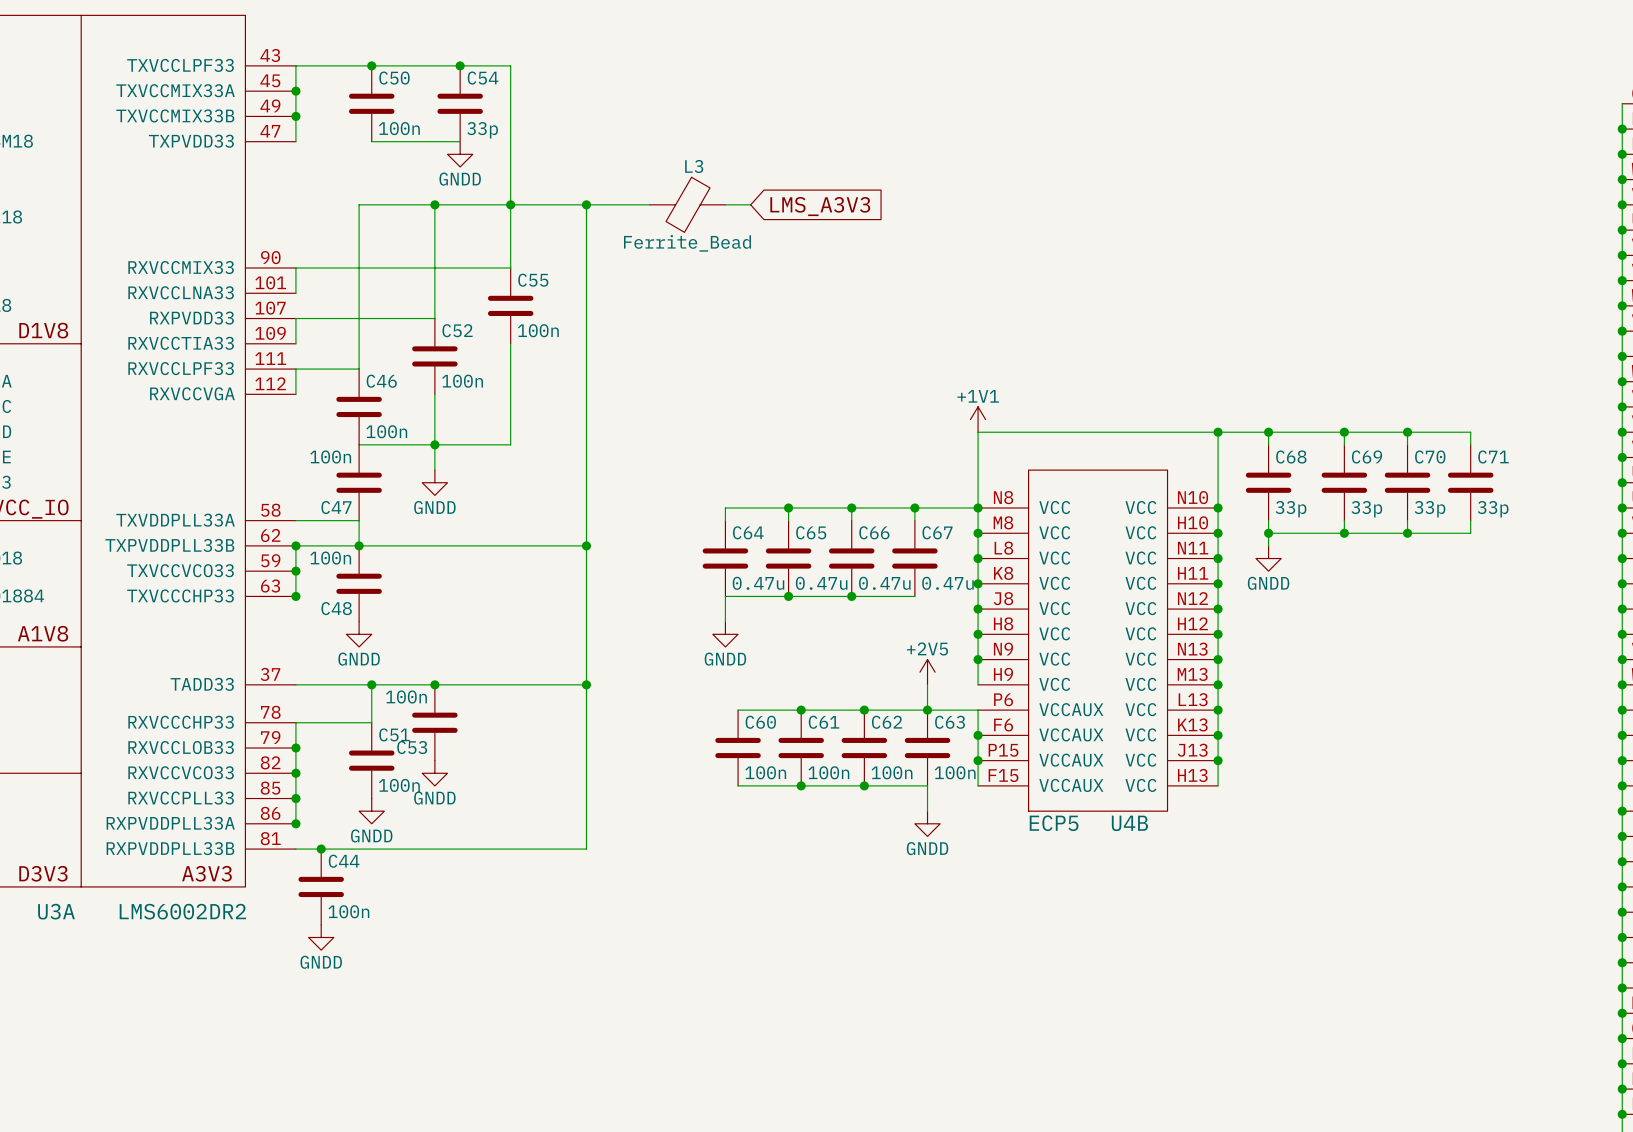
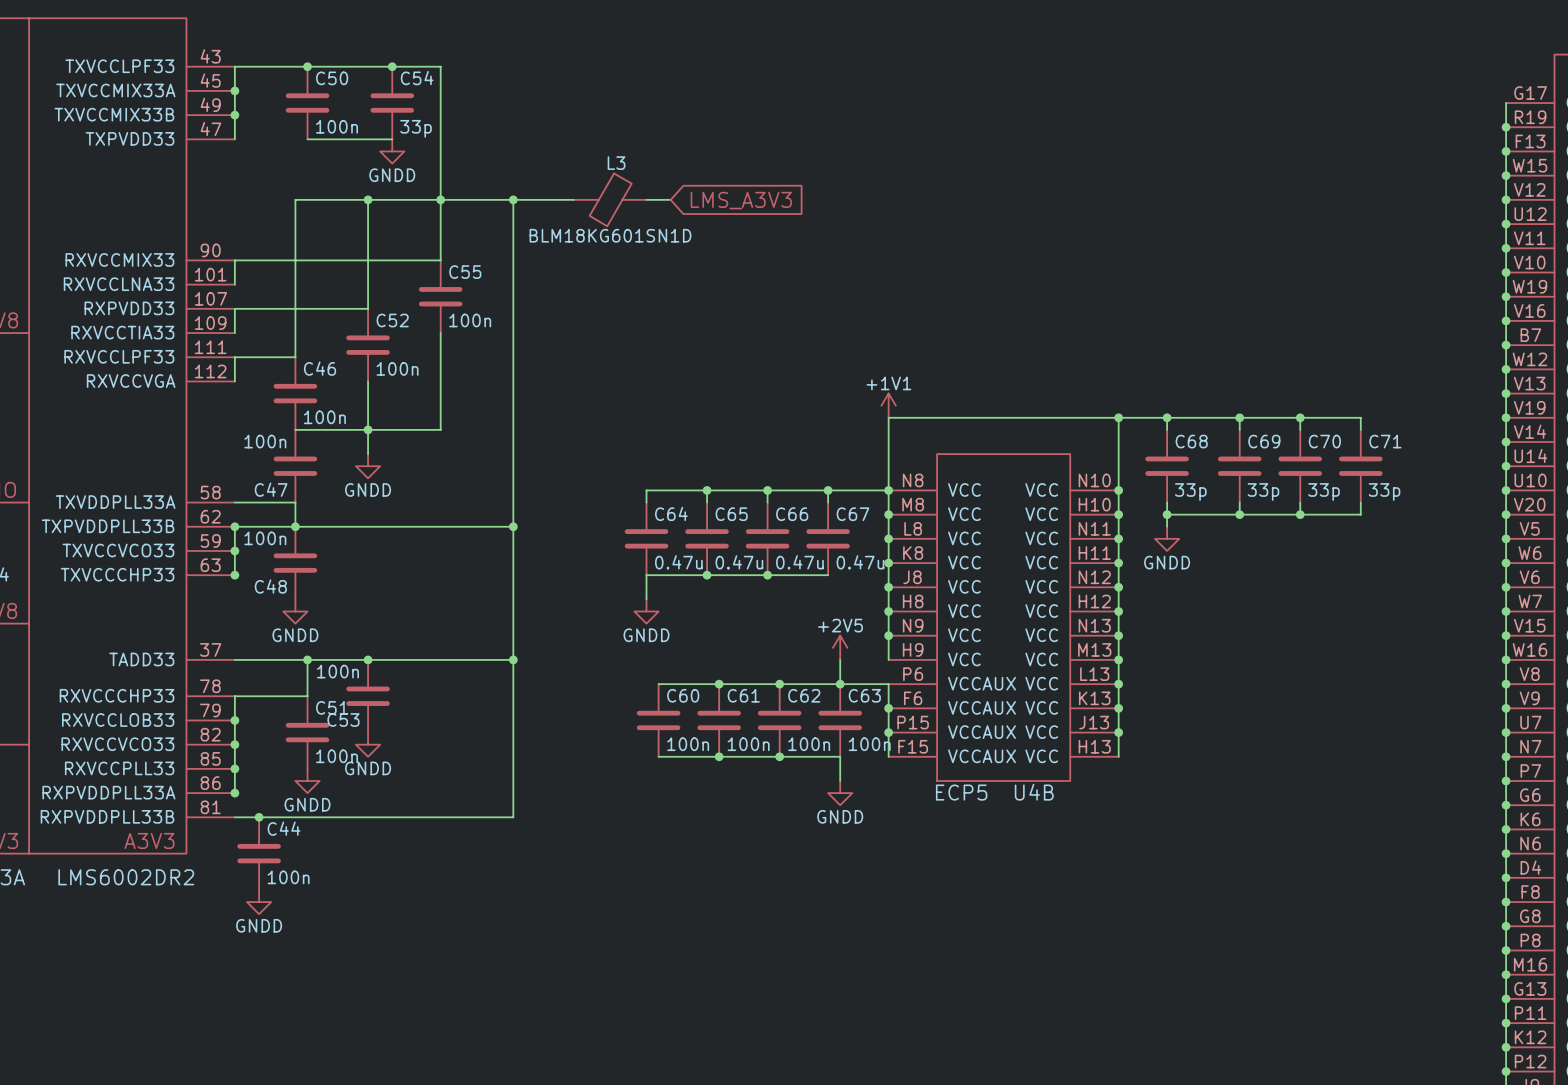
L3 value: Ferrite_Bead (687, 243) -> BLM18KG601SN1D (610, 235)

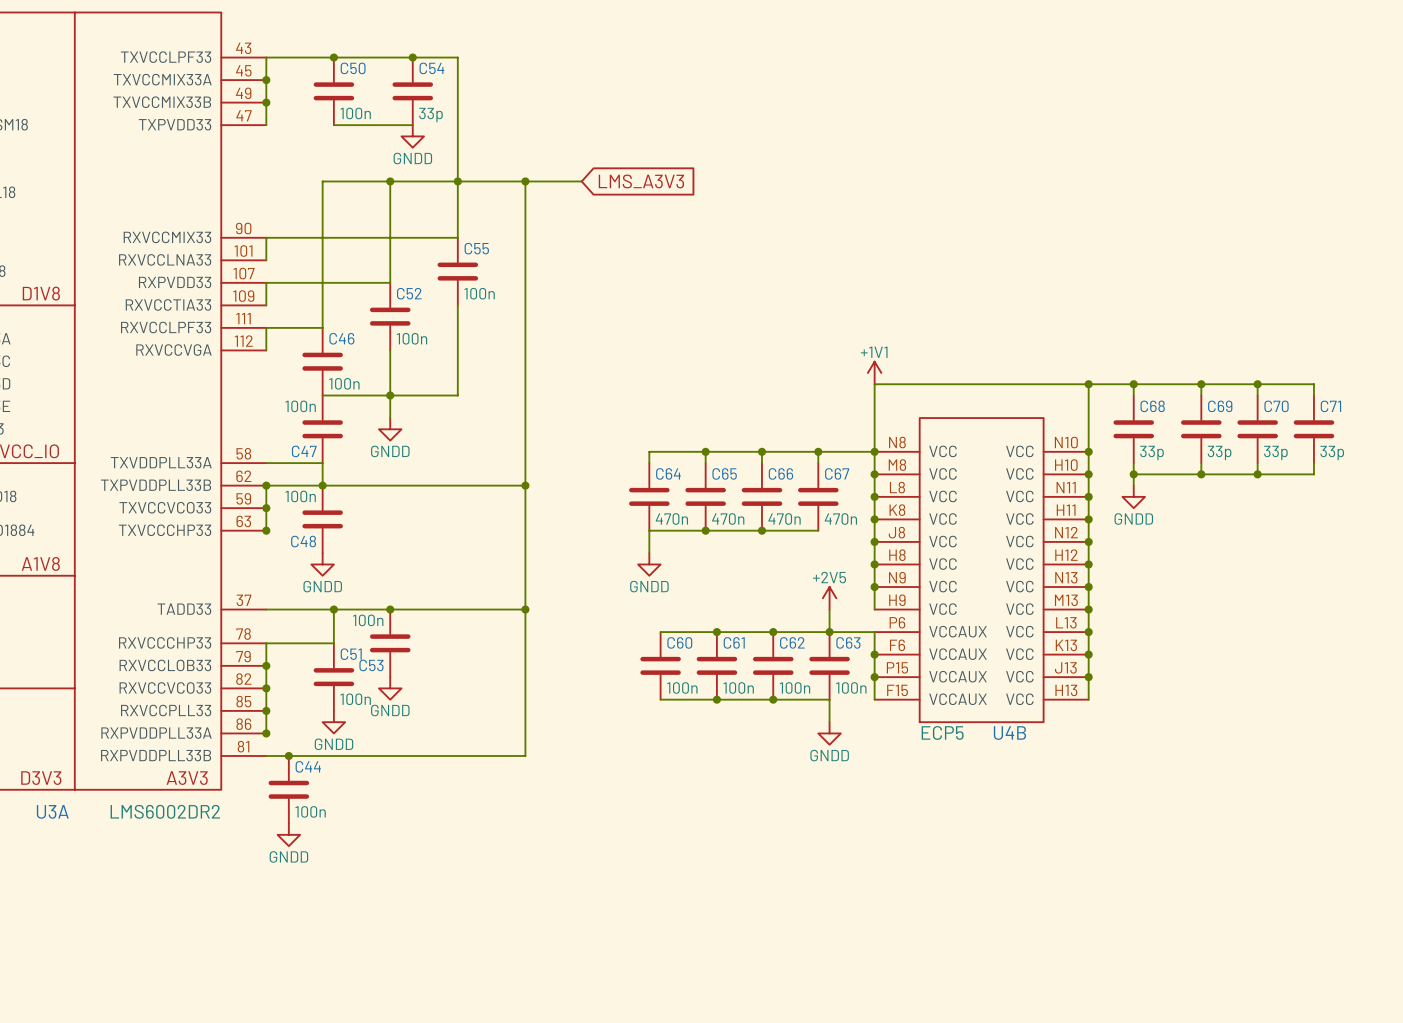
L3: BLM18KG601SN1D (610, 199) -> none
wire: (646, 199) (670, 199) -> none
global label position: LMS_A3V3 (741, 200) -> LMS_A3V3 (641, 181)
C64 value: 0.47u (678, 562) -> 470n (671, 519)
C65 value: 0.47u (739, 562) -> 470n (728, 519)
C66 value: 0.47u (799, 562) -> 470n (784, 519)
C67 value: 0.47u (860, 562) -> 470n (840, 519)

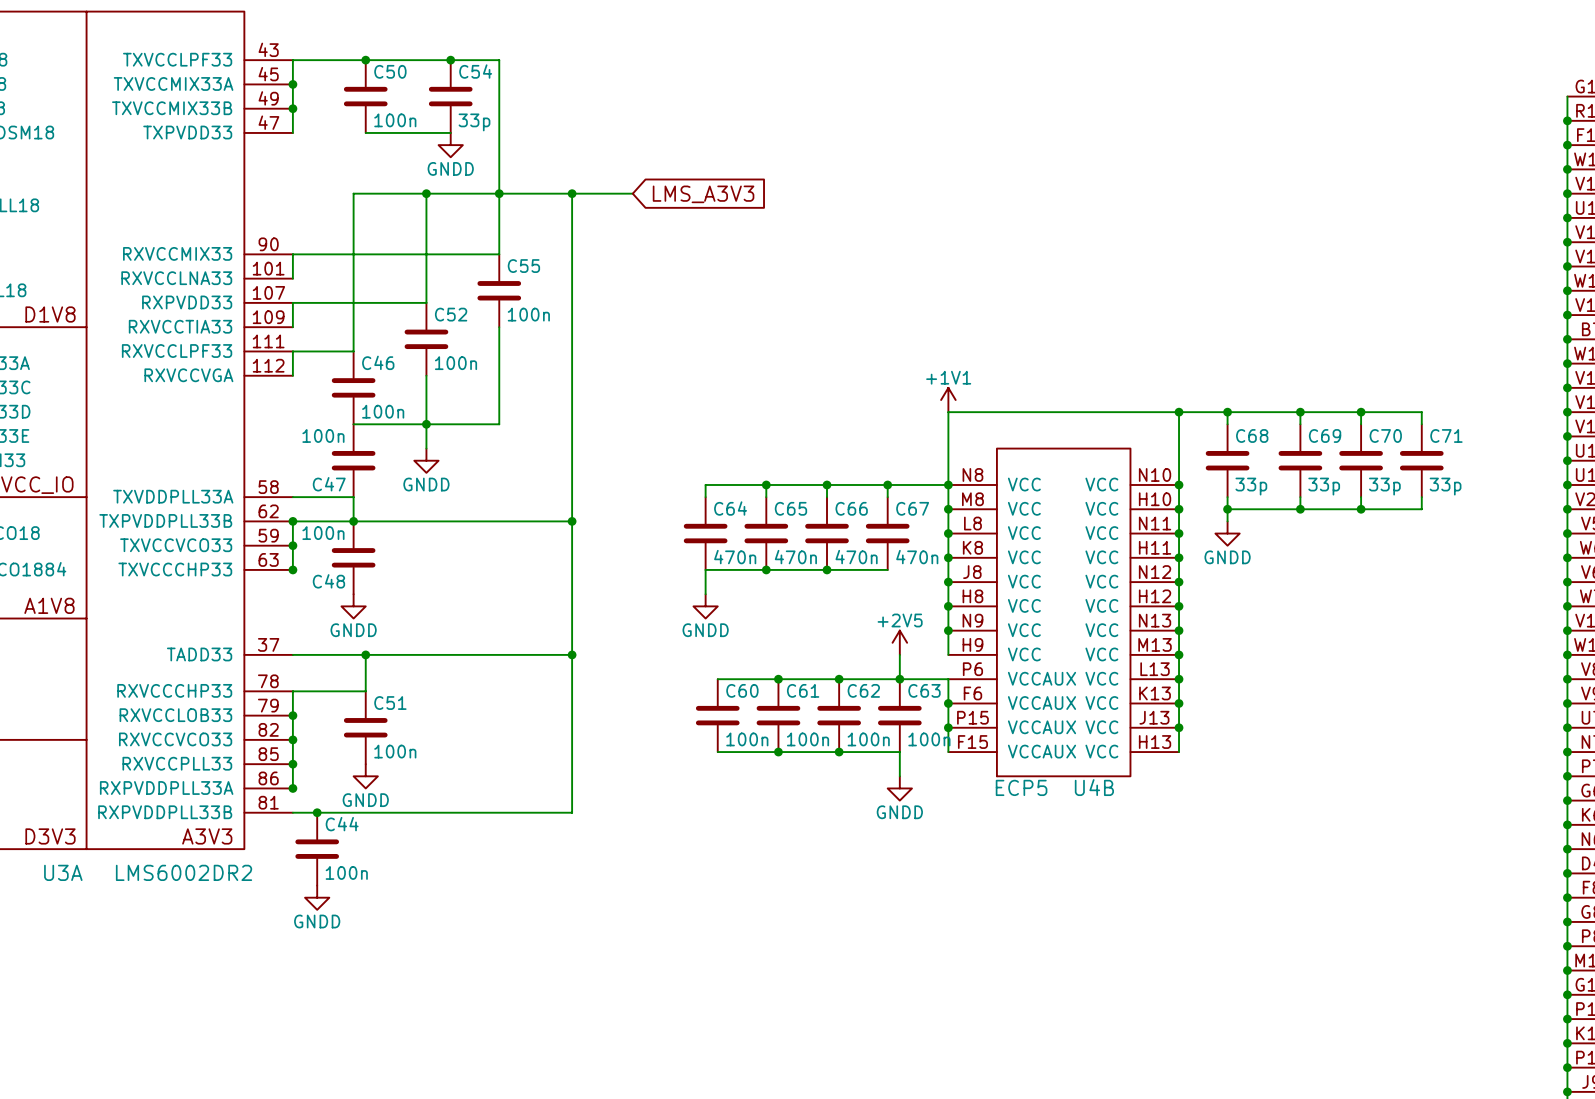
junction: (390, 609) -> none
C53: 100n (390, 643) -> none
power symbol: GNDD (390, 688) -> none

